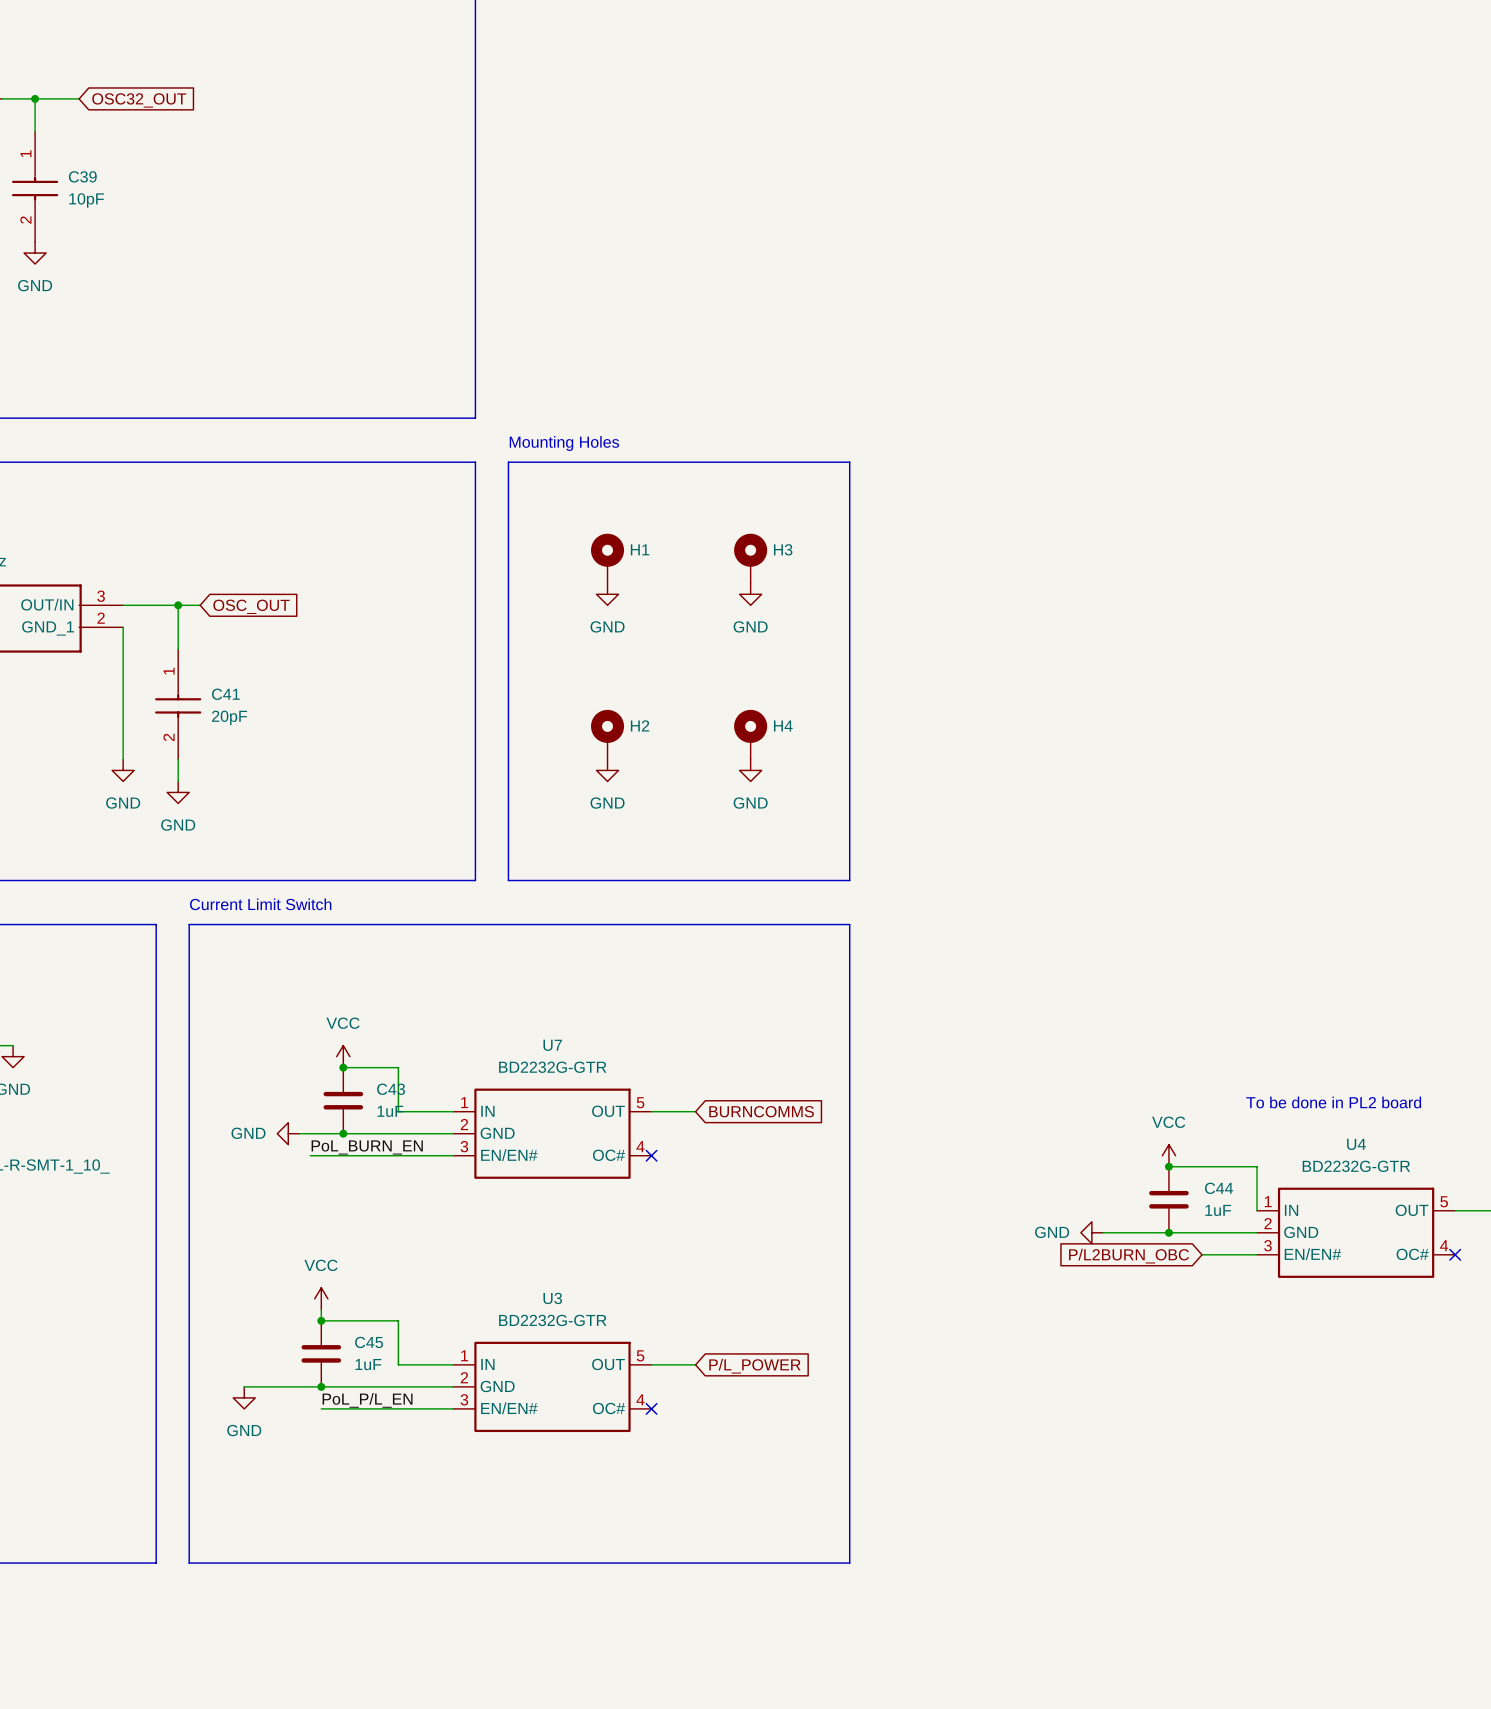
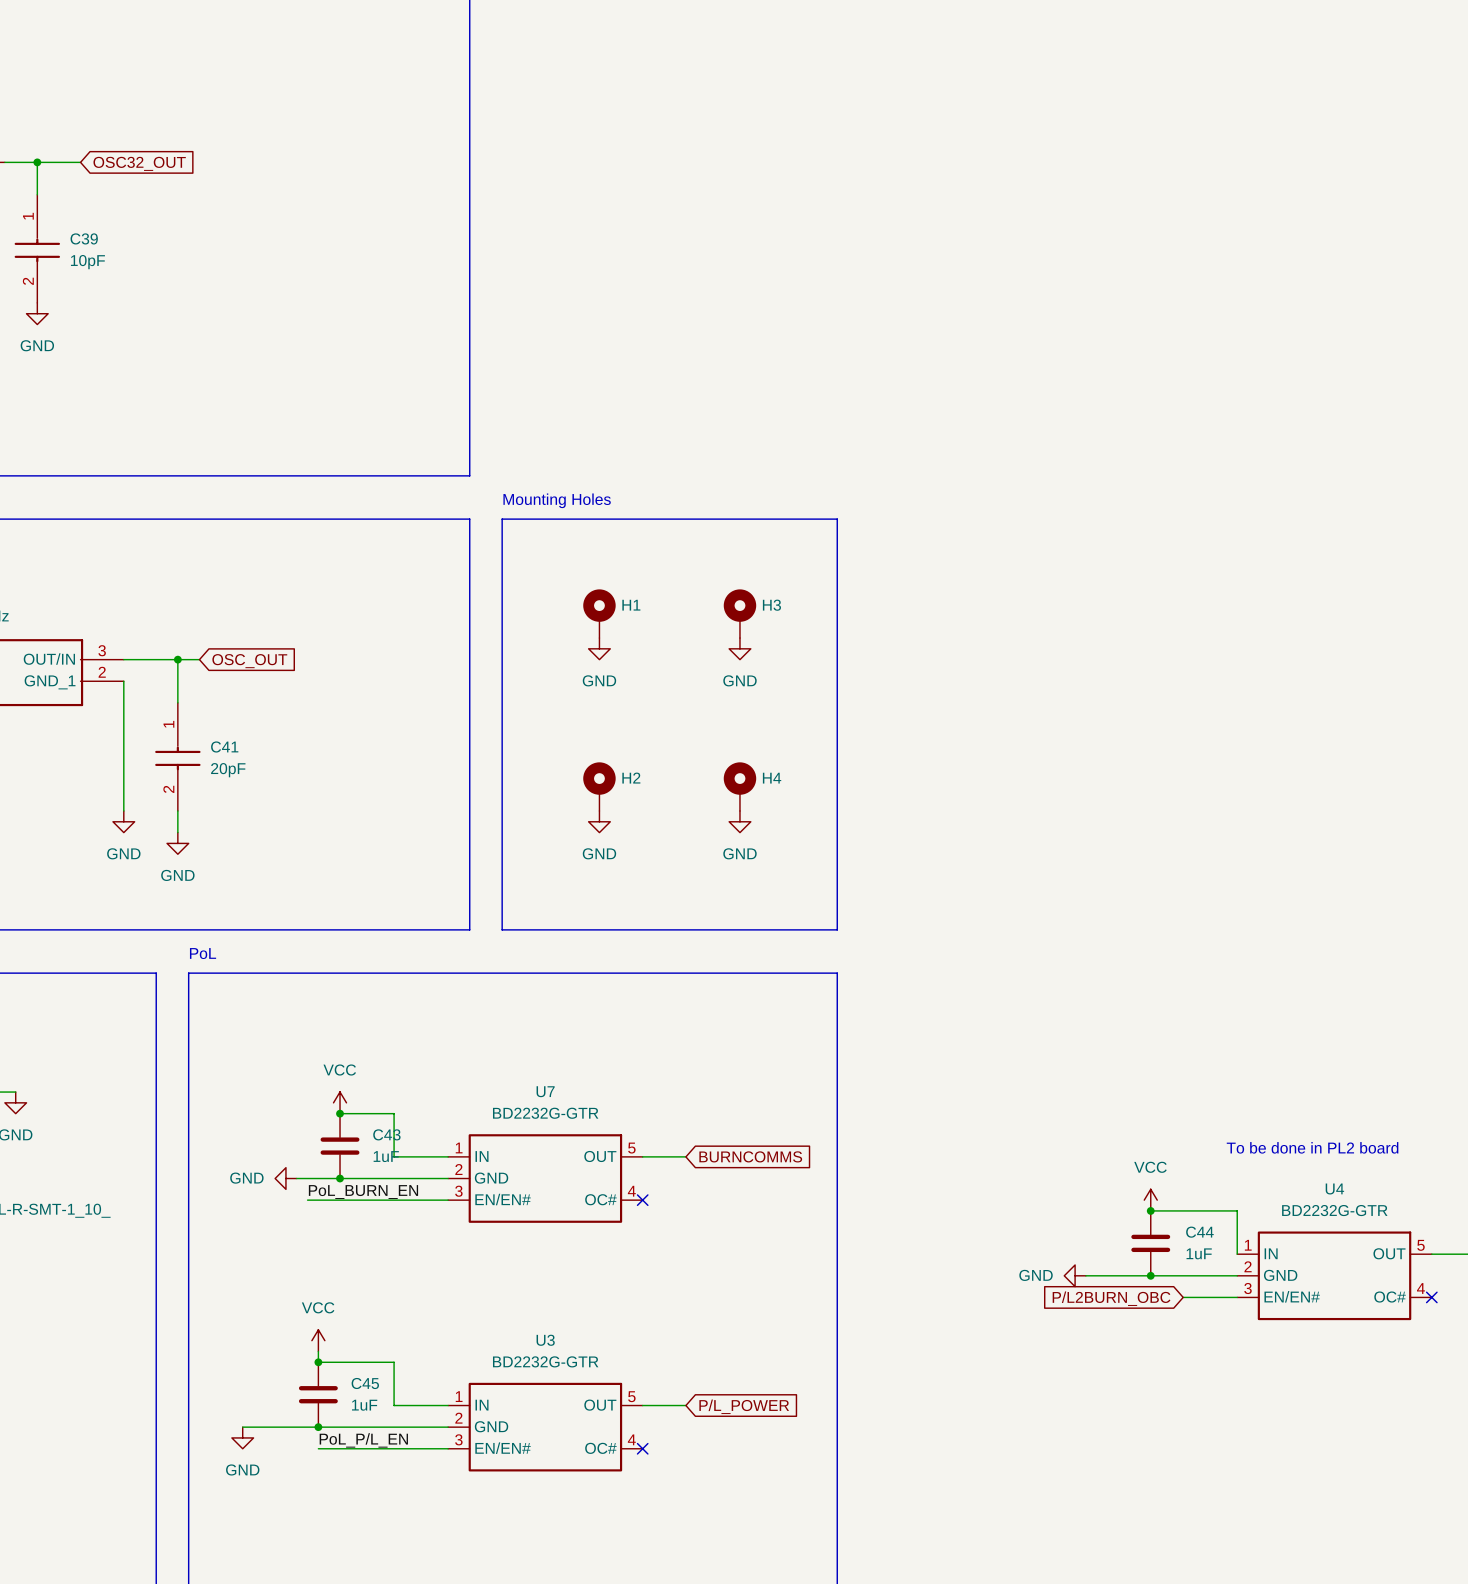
text: Current Limit Switch (260, 904) -> PoL (203, 953)

